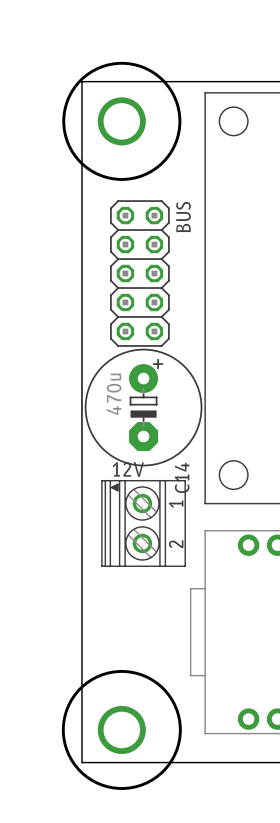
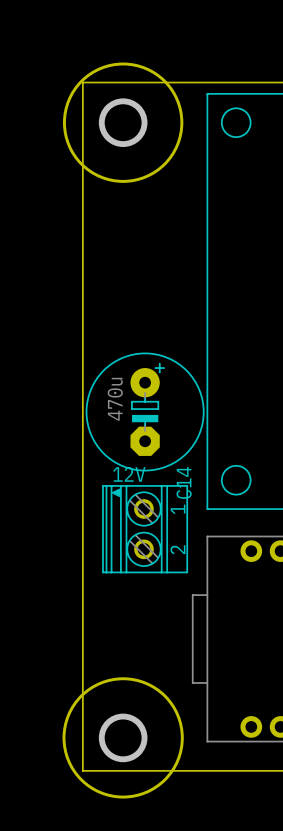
BUS: (139, 273) -> none

